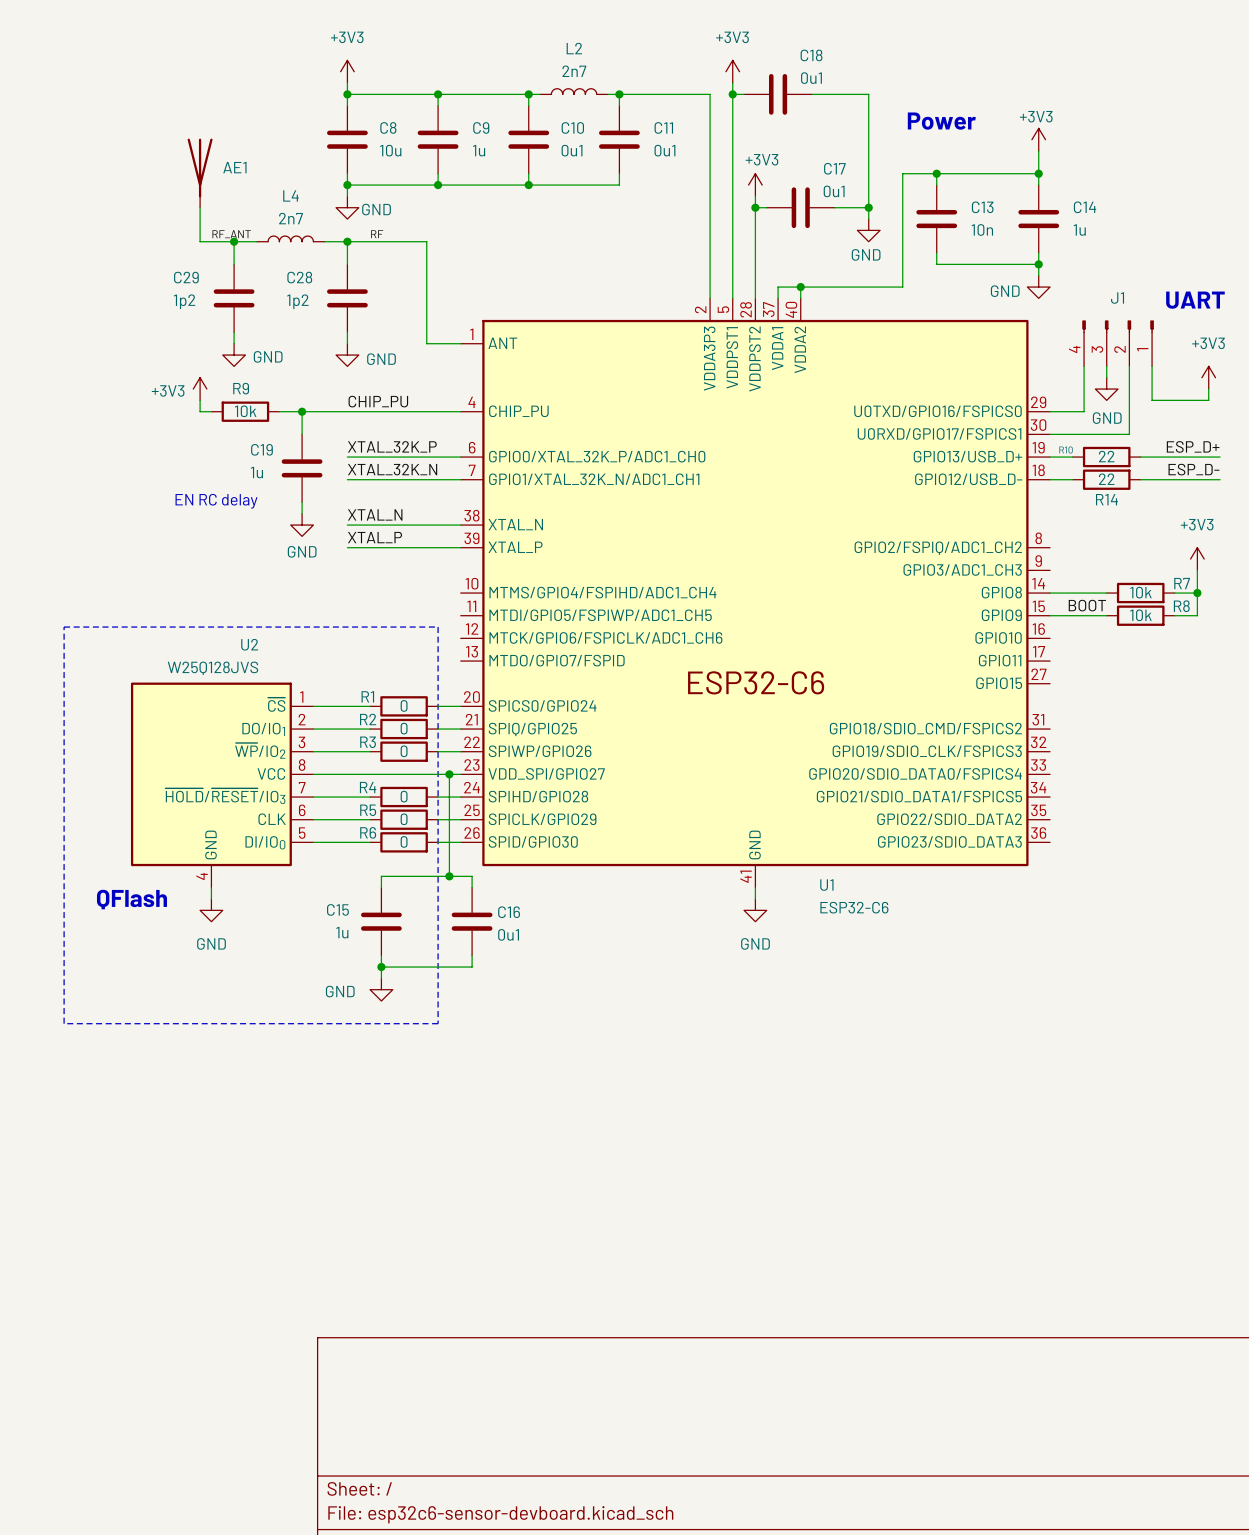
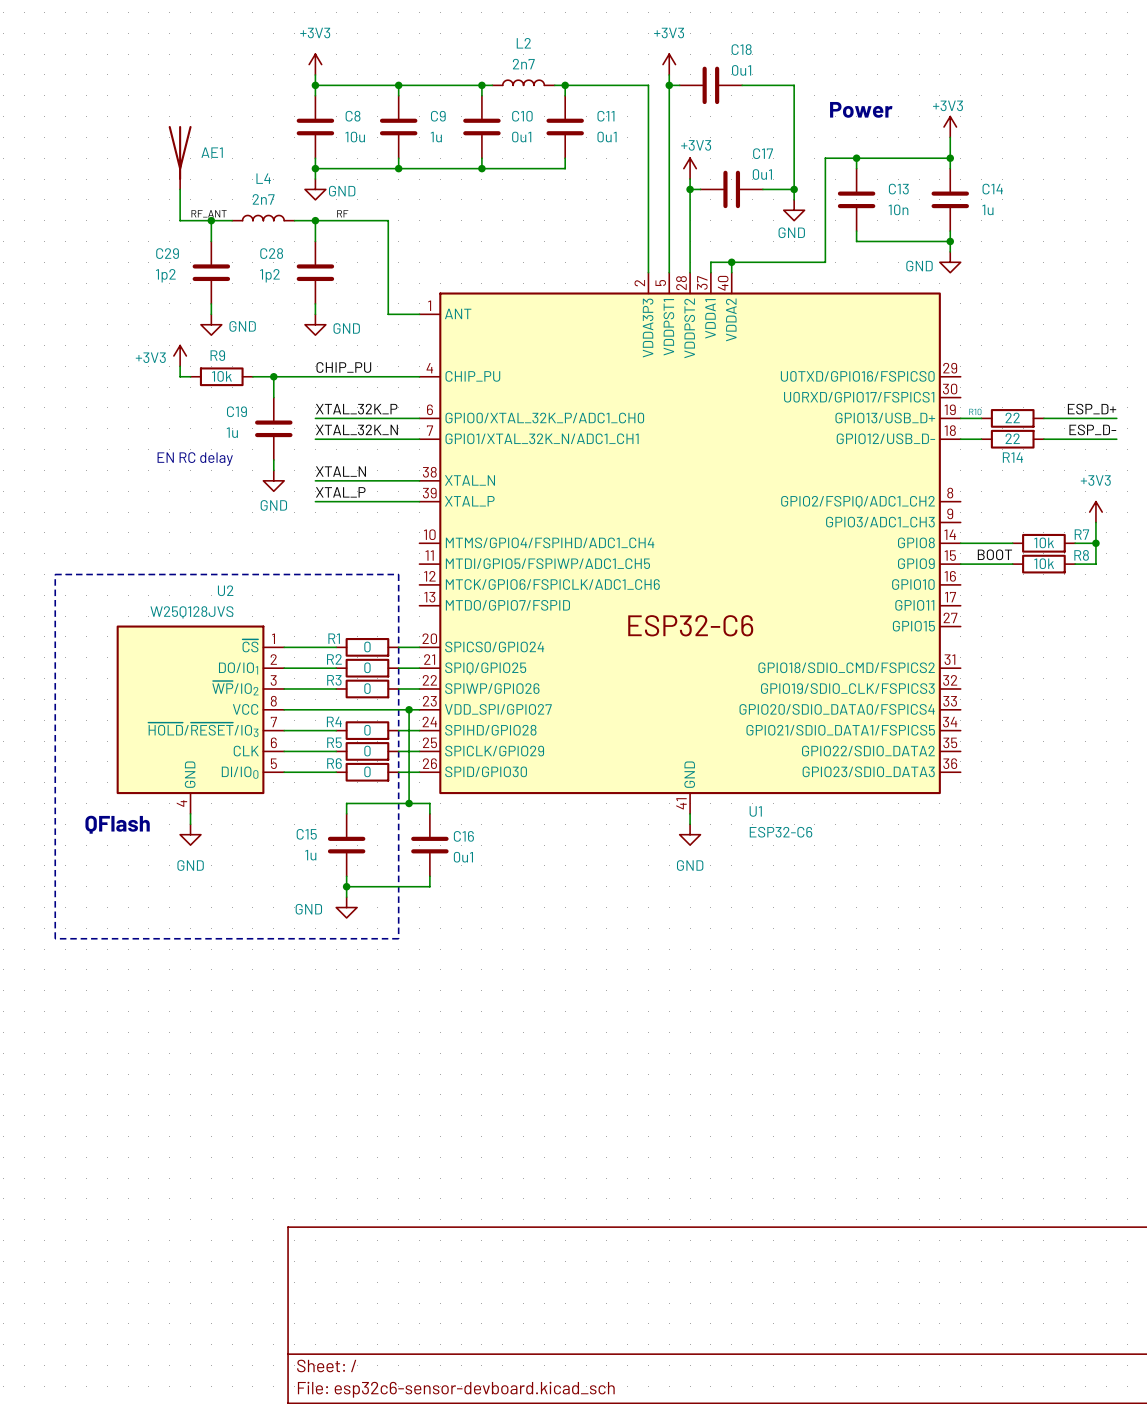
text: UART (1195, 300) -> none
J1: (1118, 343) -> none
wire: (1084, 366) (1084, 411) (1050, 411) -> none
wire: (1106, 366) (1106, 377) -> none
wire: (1129, 366) (1129, 434) (1050, 434) -> none
wire: (1152, 366) (1152, 400) (1208, 400) (1208, 389) -> none
power symbol: +3V3 (1208, 377) -> none
power symbol: GND (1106, 389) -> none

